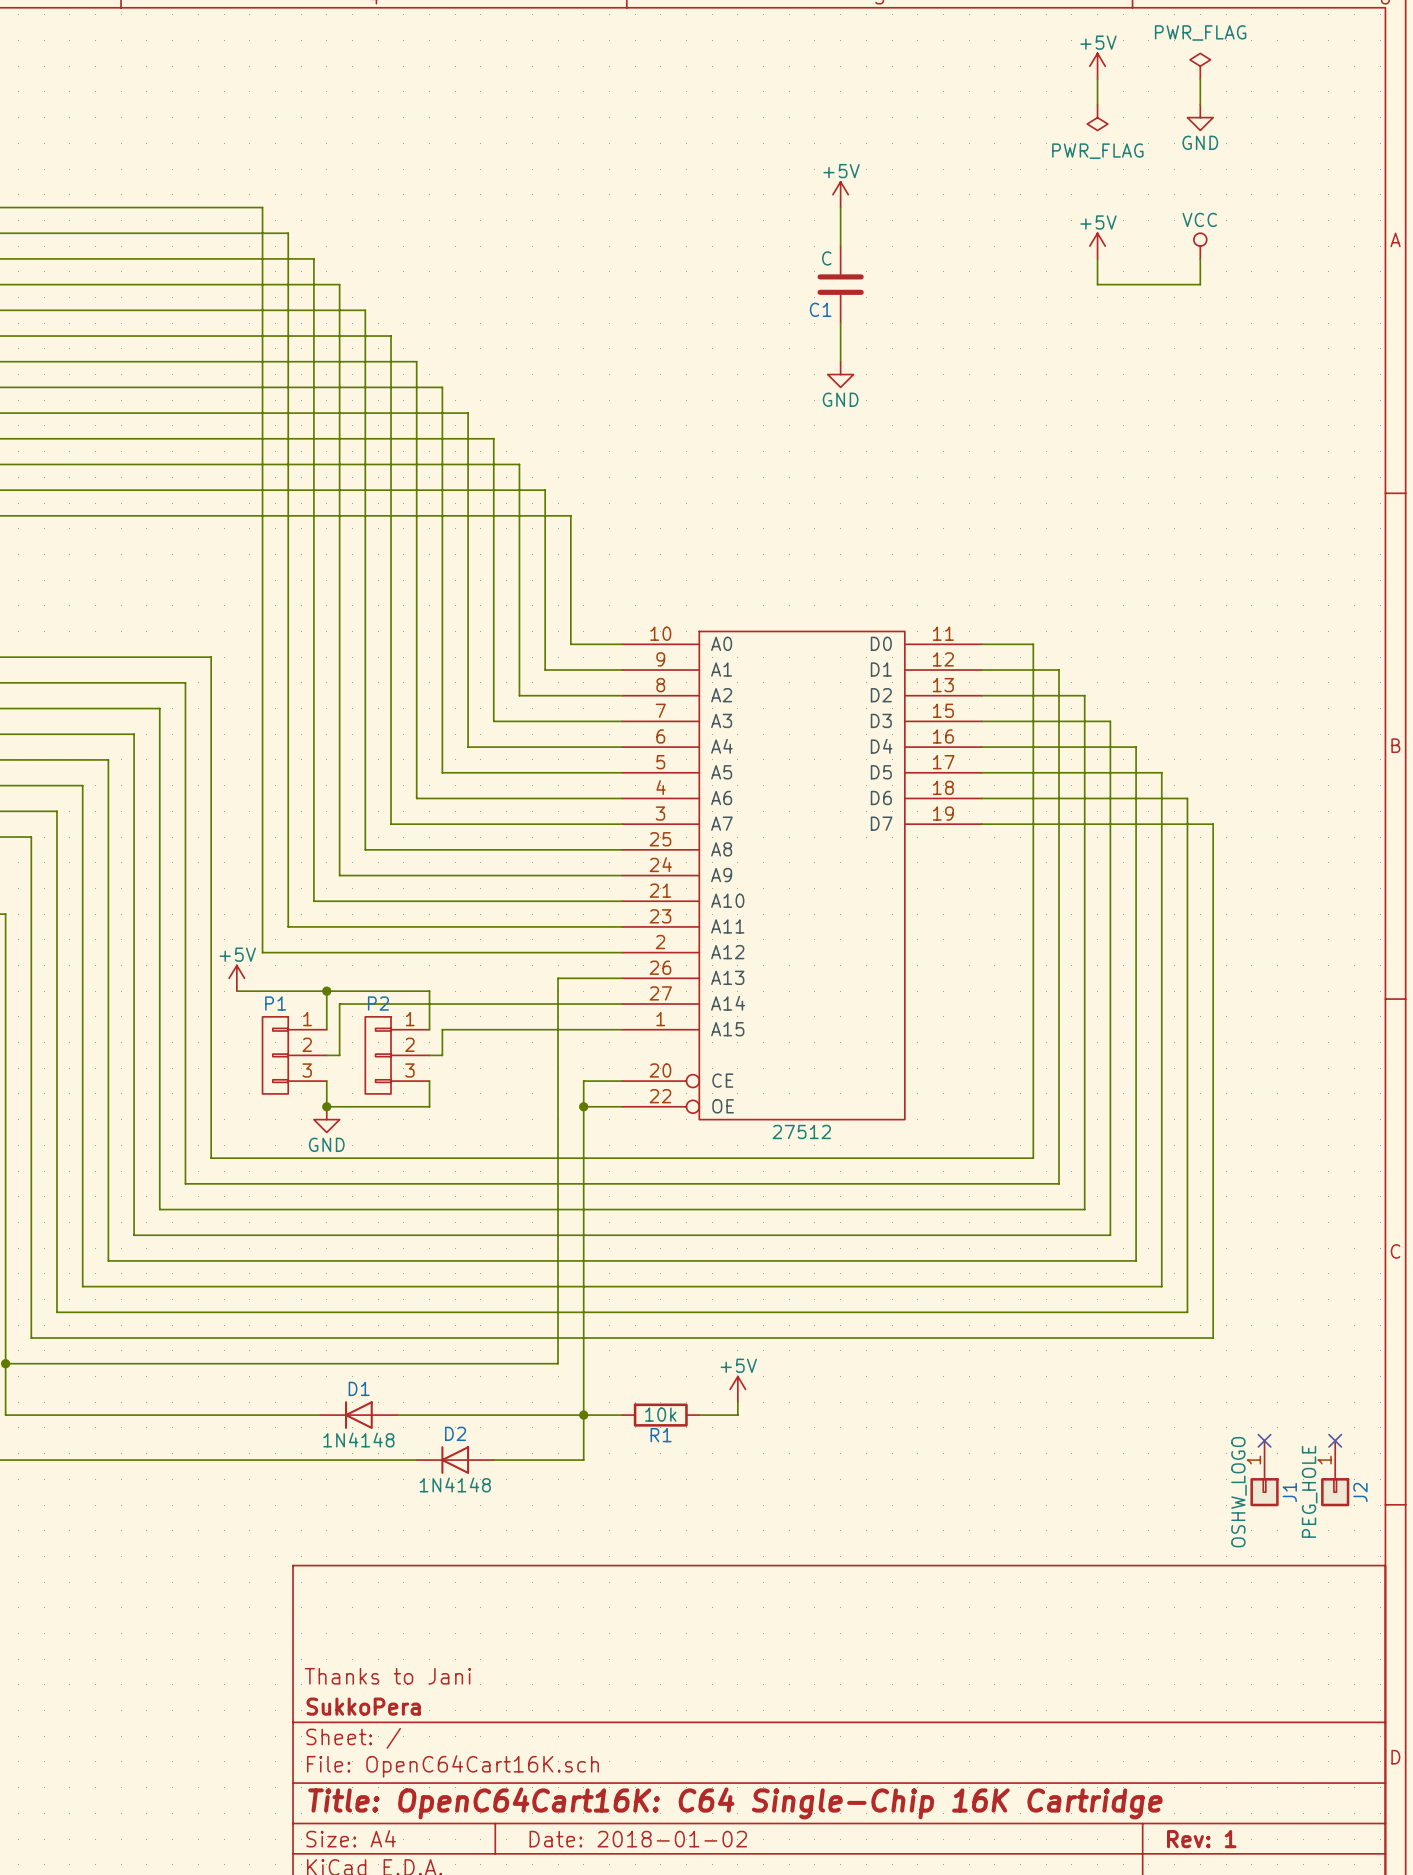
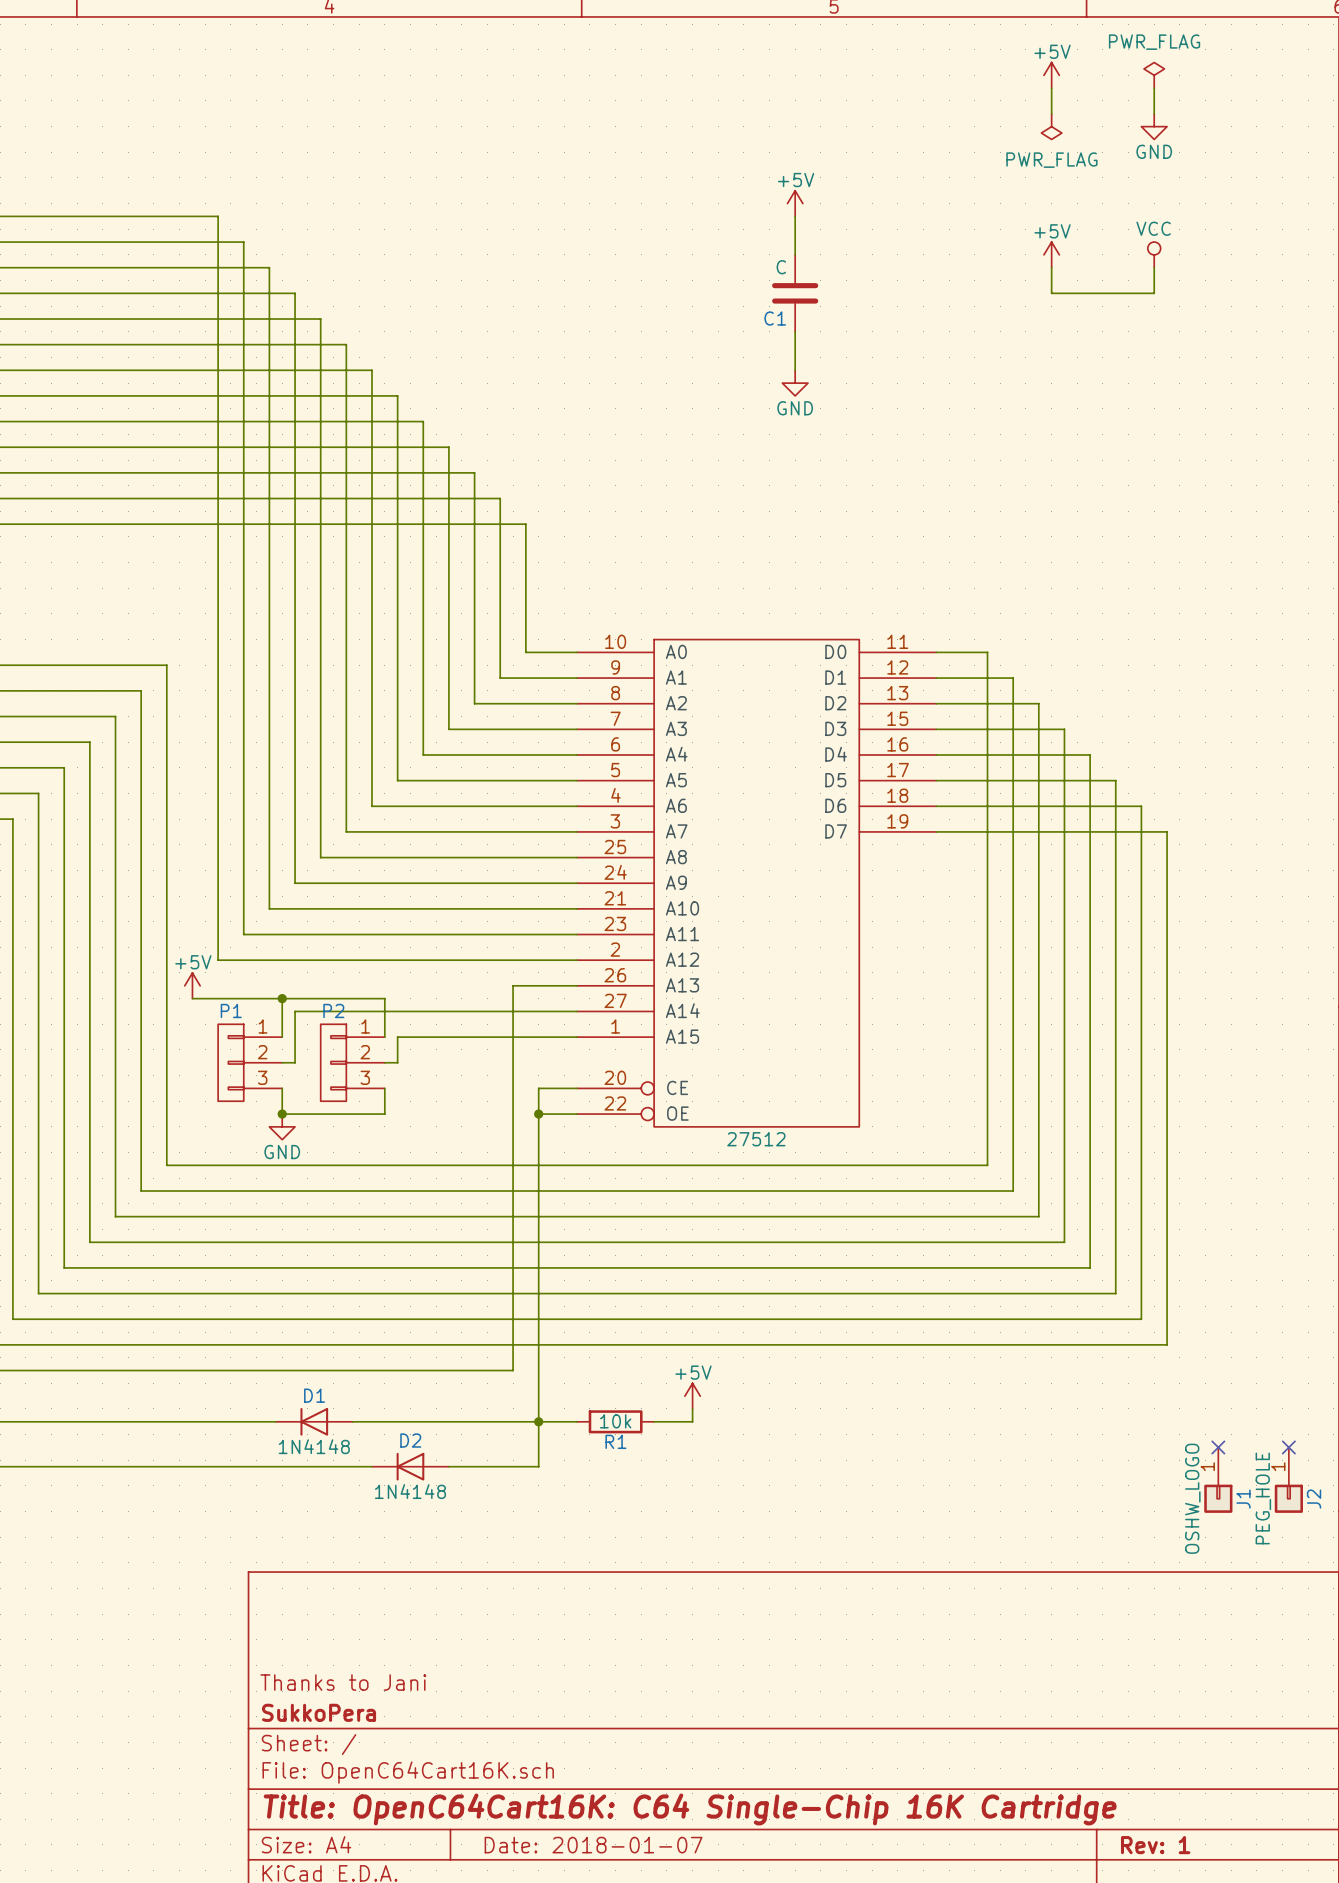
title block: Date: 2018-01-02 (638, 1839) -> Date: 2018-01-07 (593, 1845)

